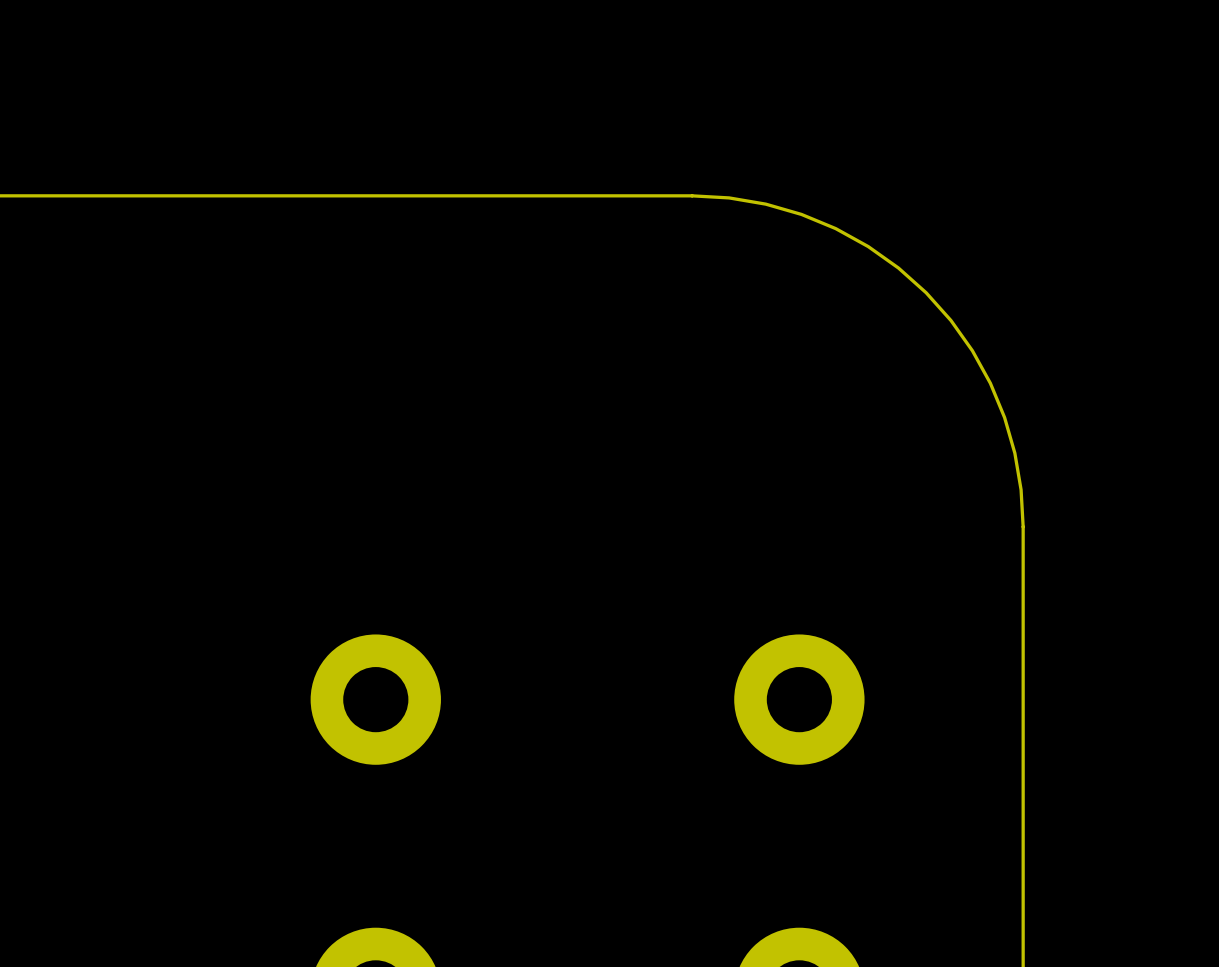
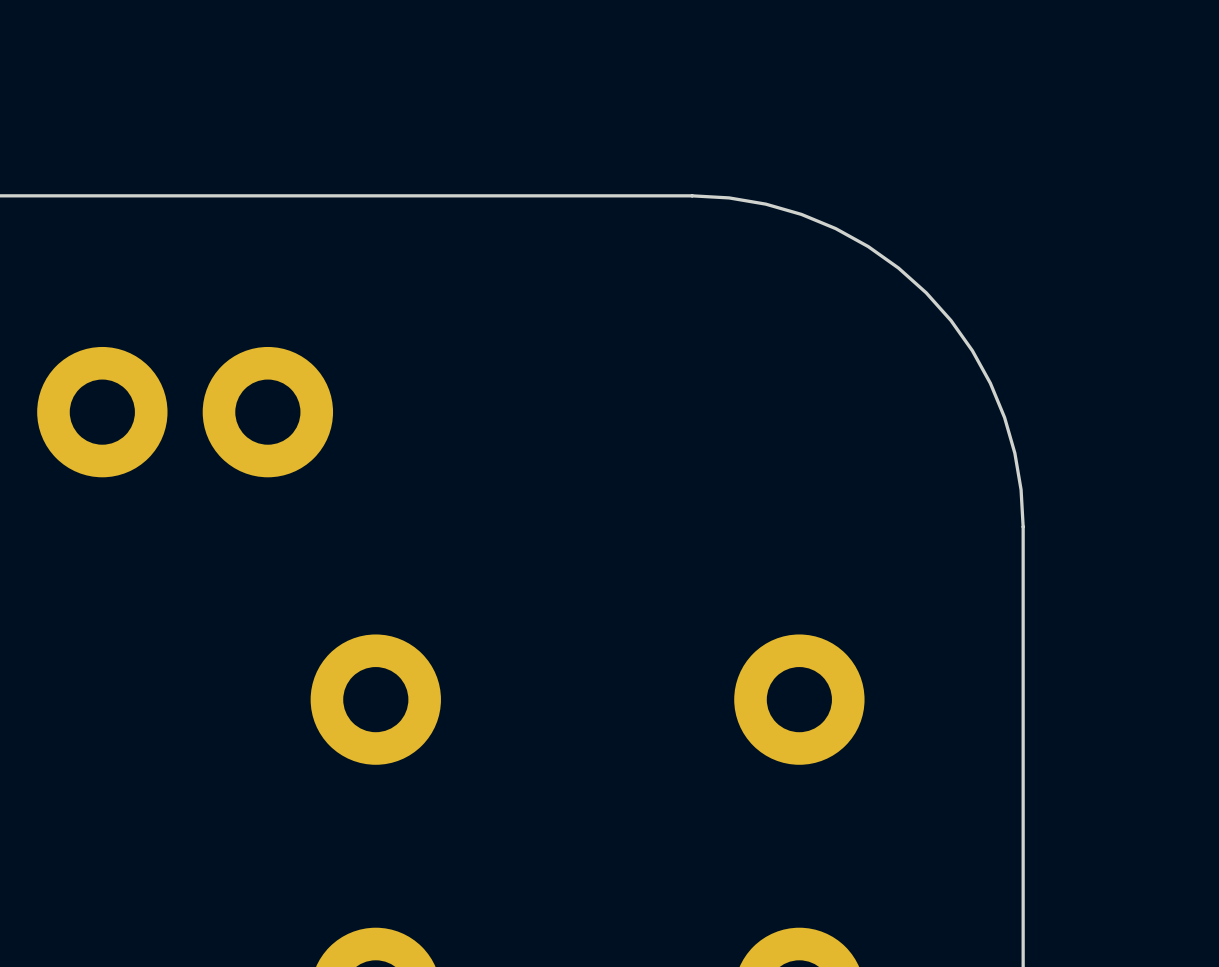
part: none -> (185, 412)

